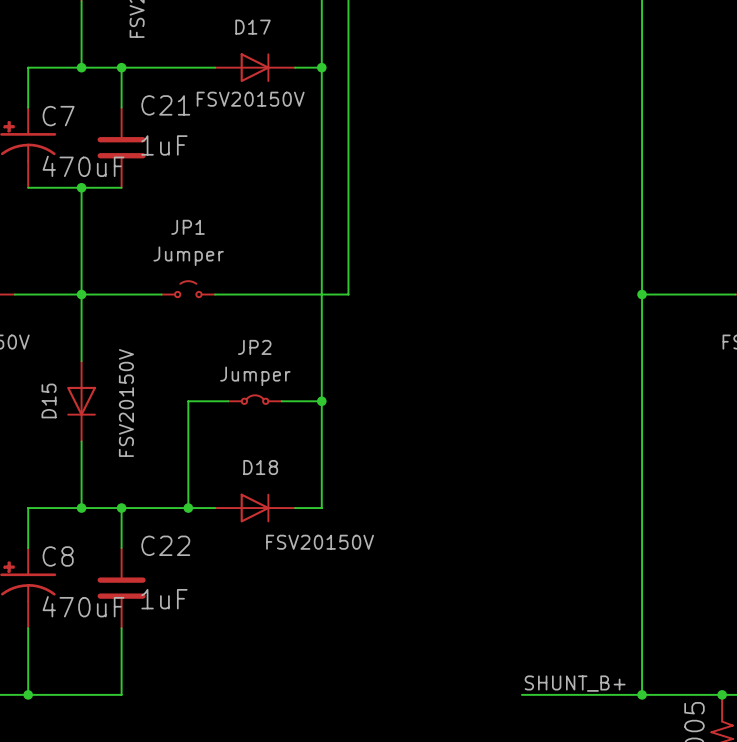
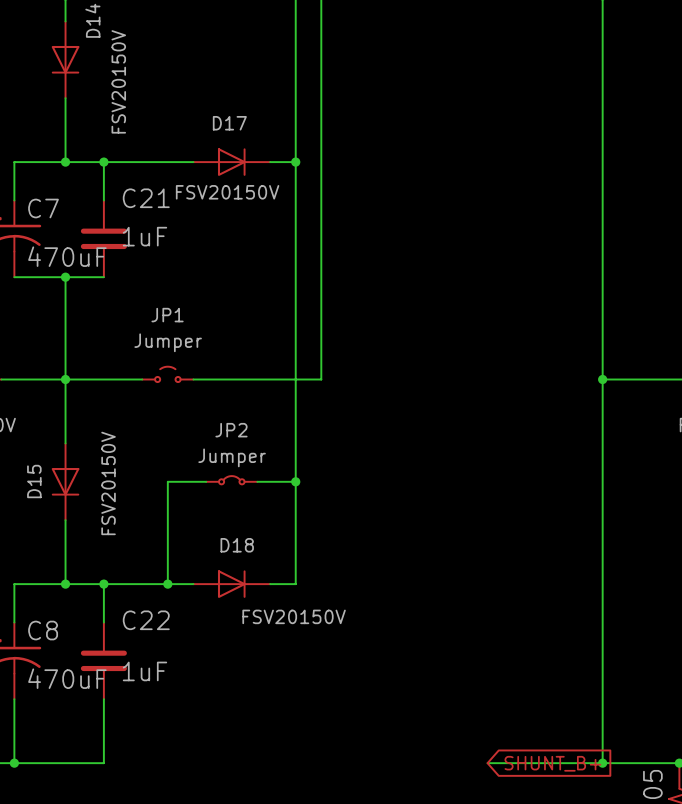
label: SHUNT_B+ (575, 683) -> none
global label: none -> SHUNT_B+ (552, 763)

